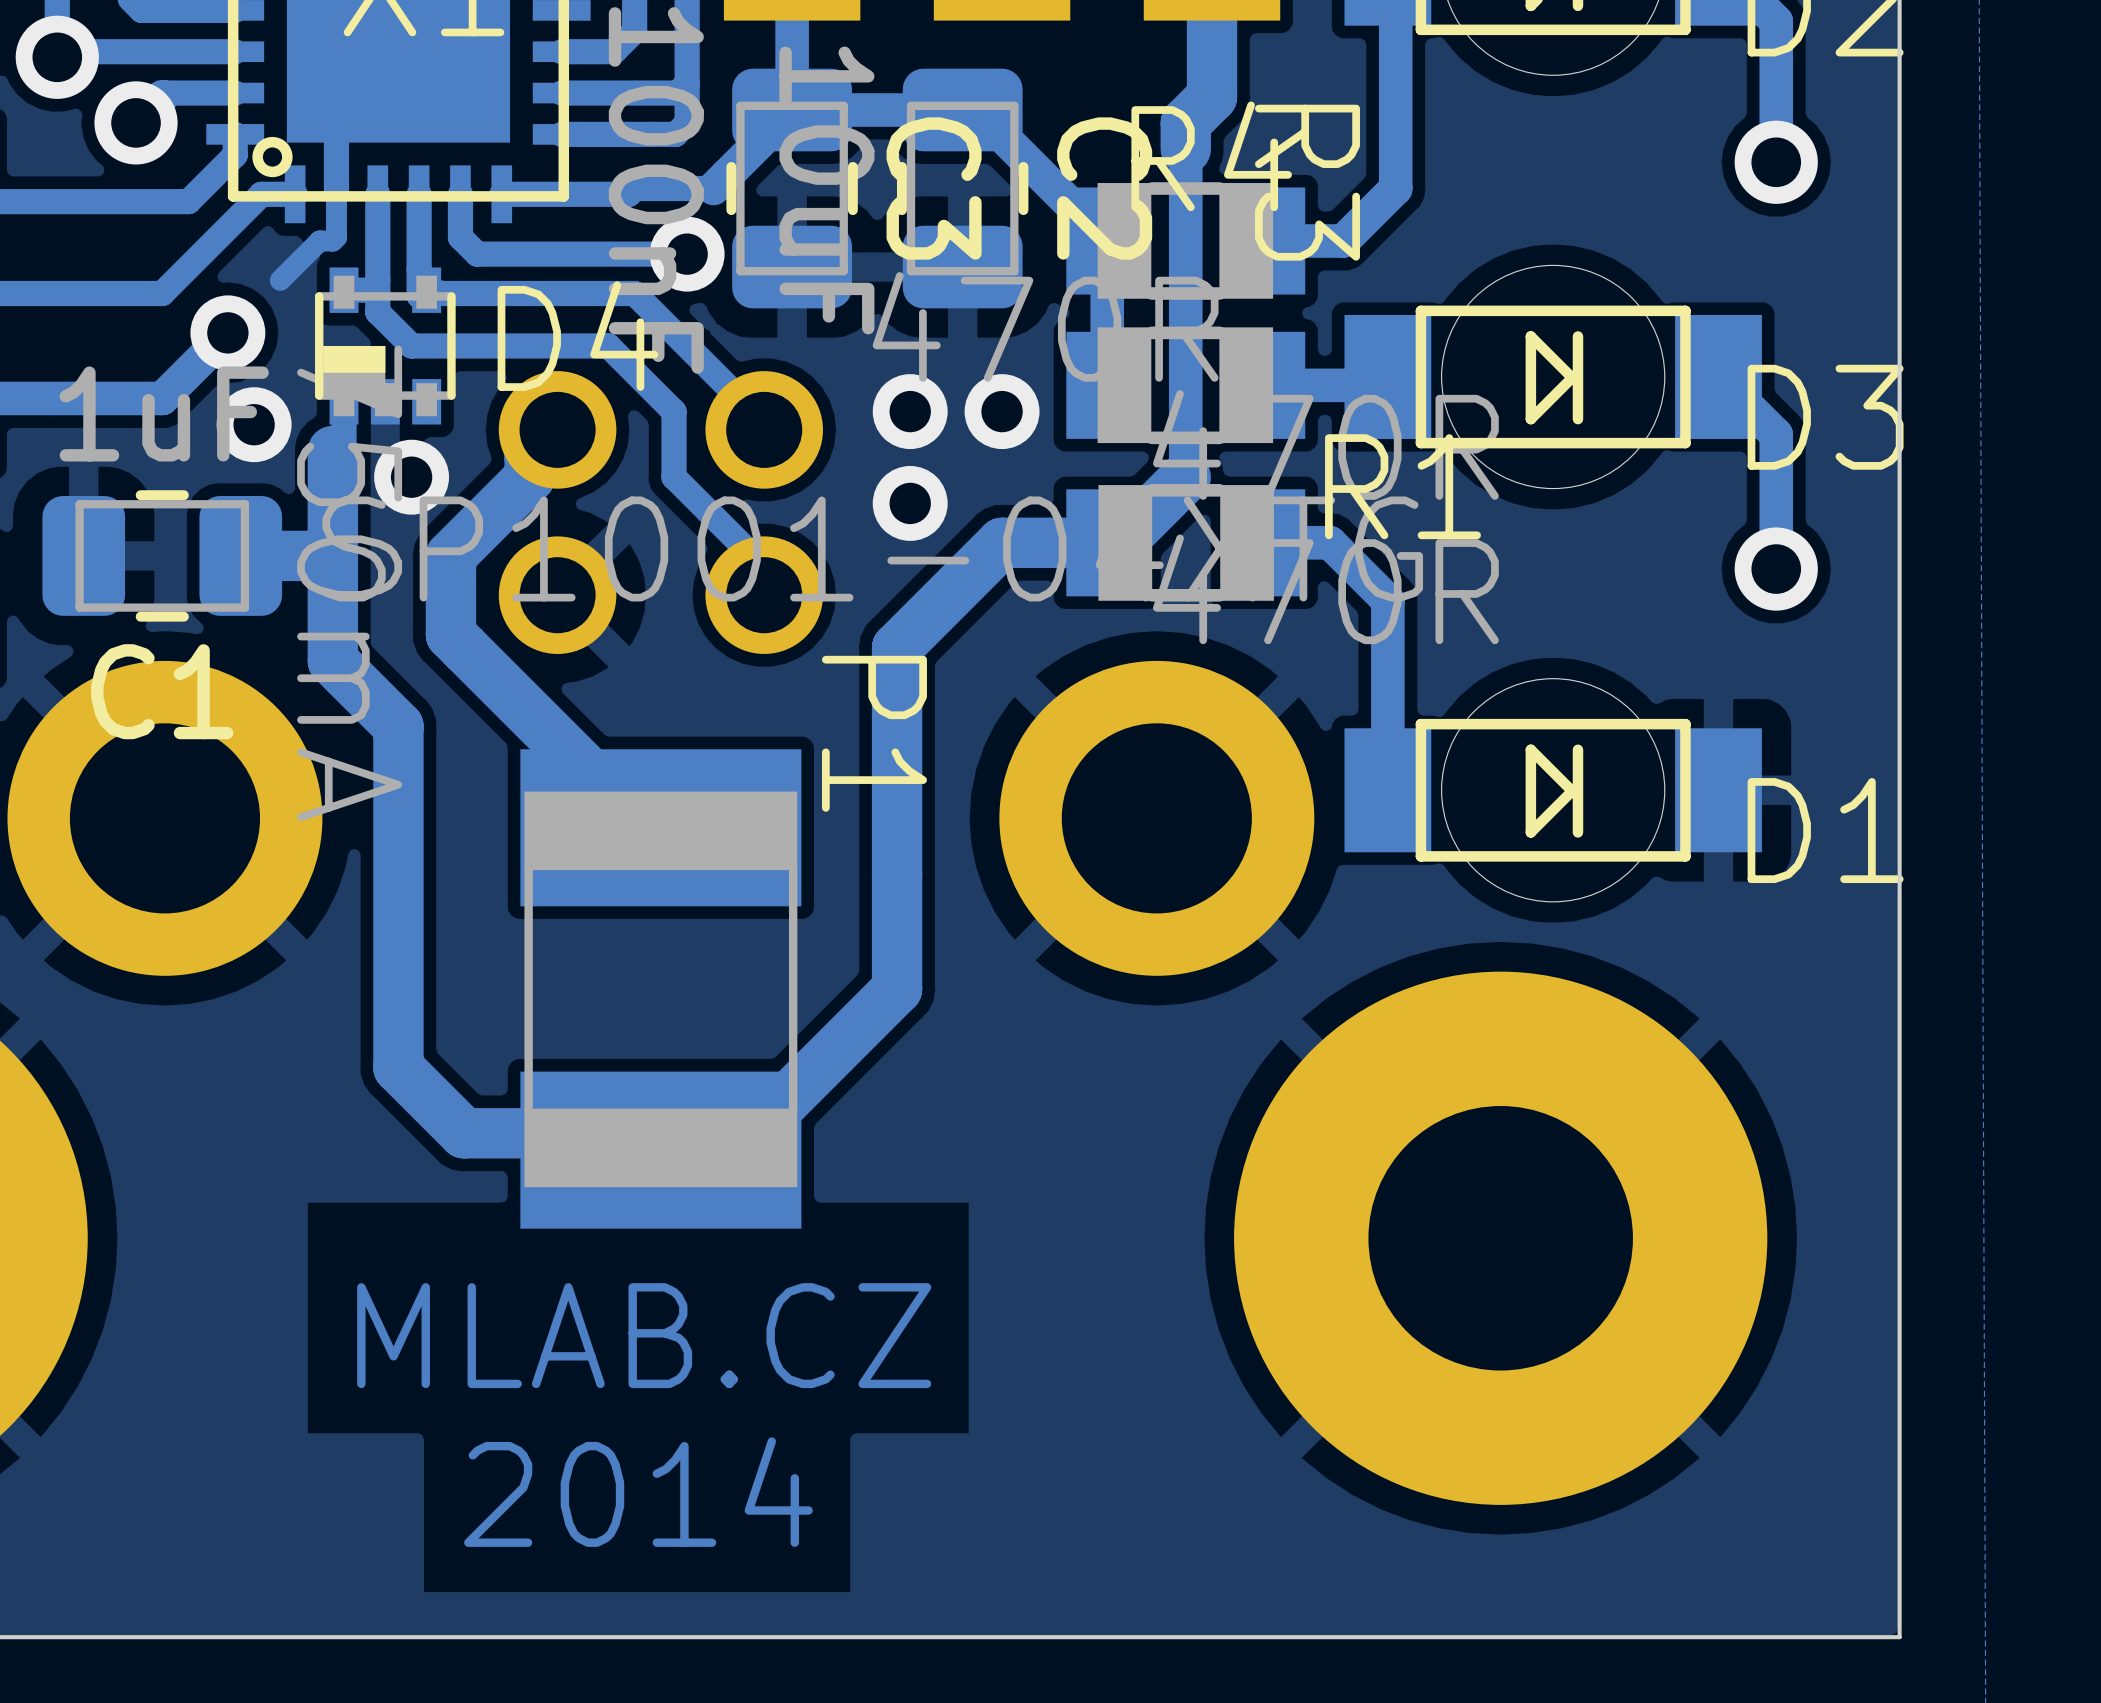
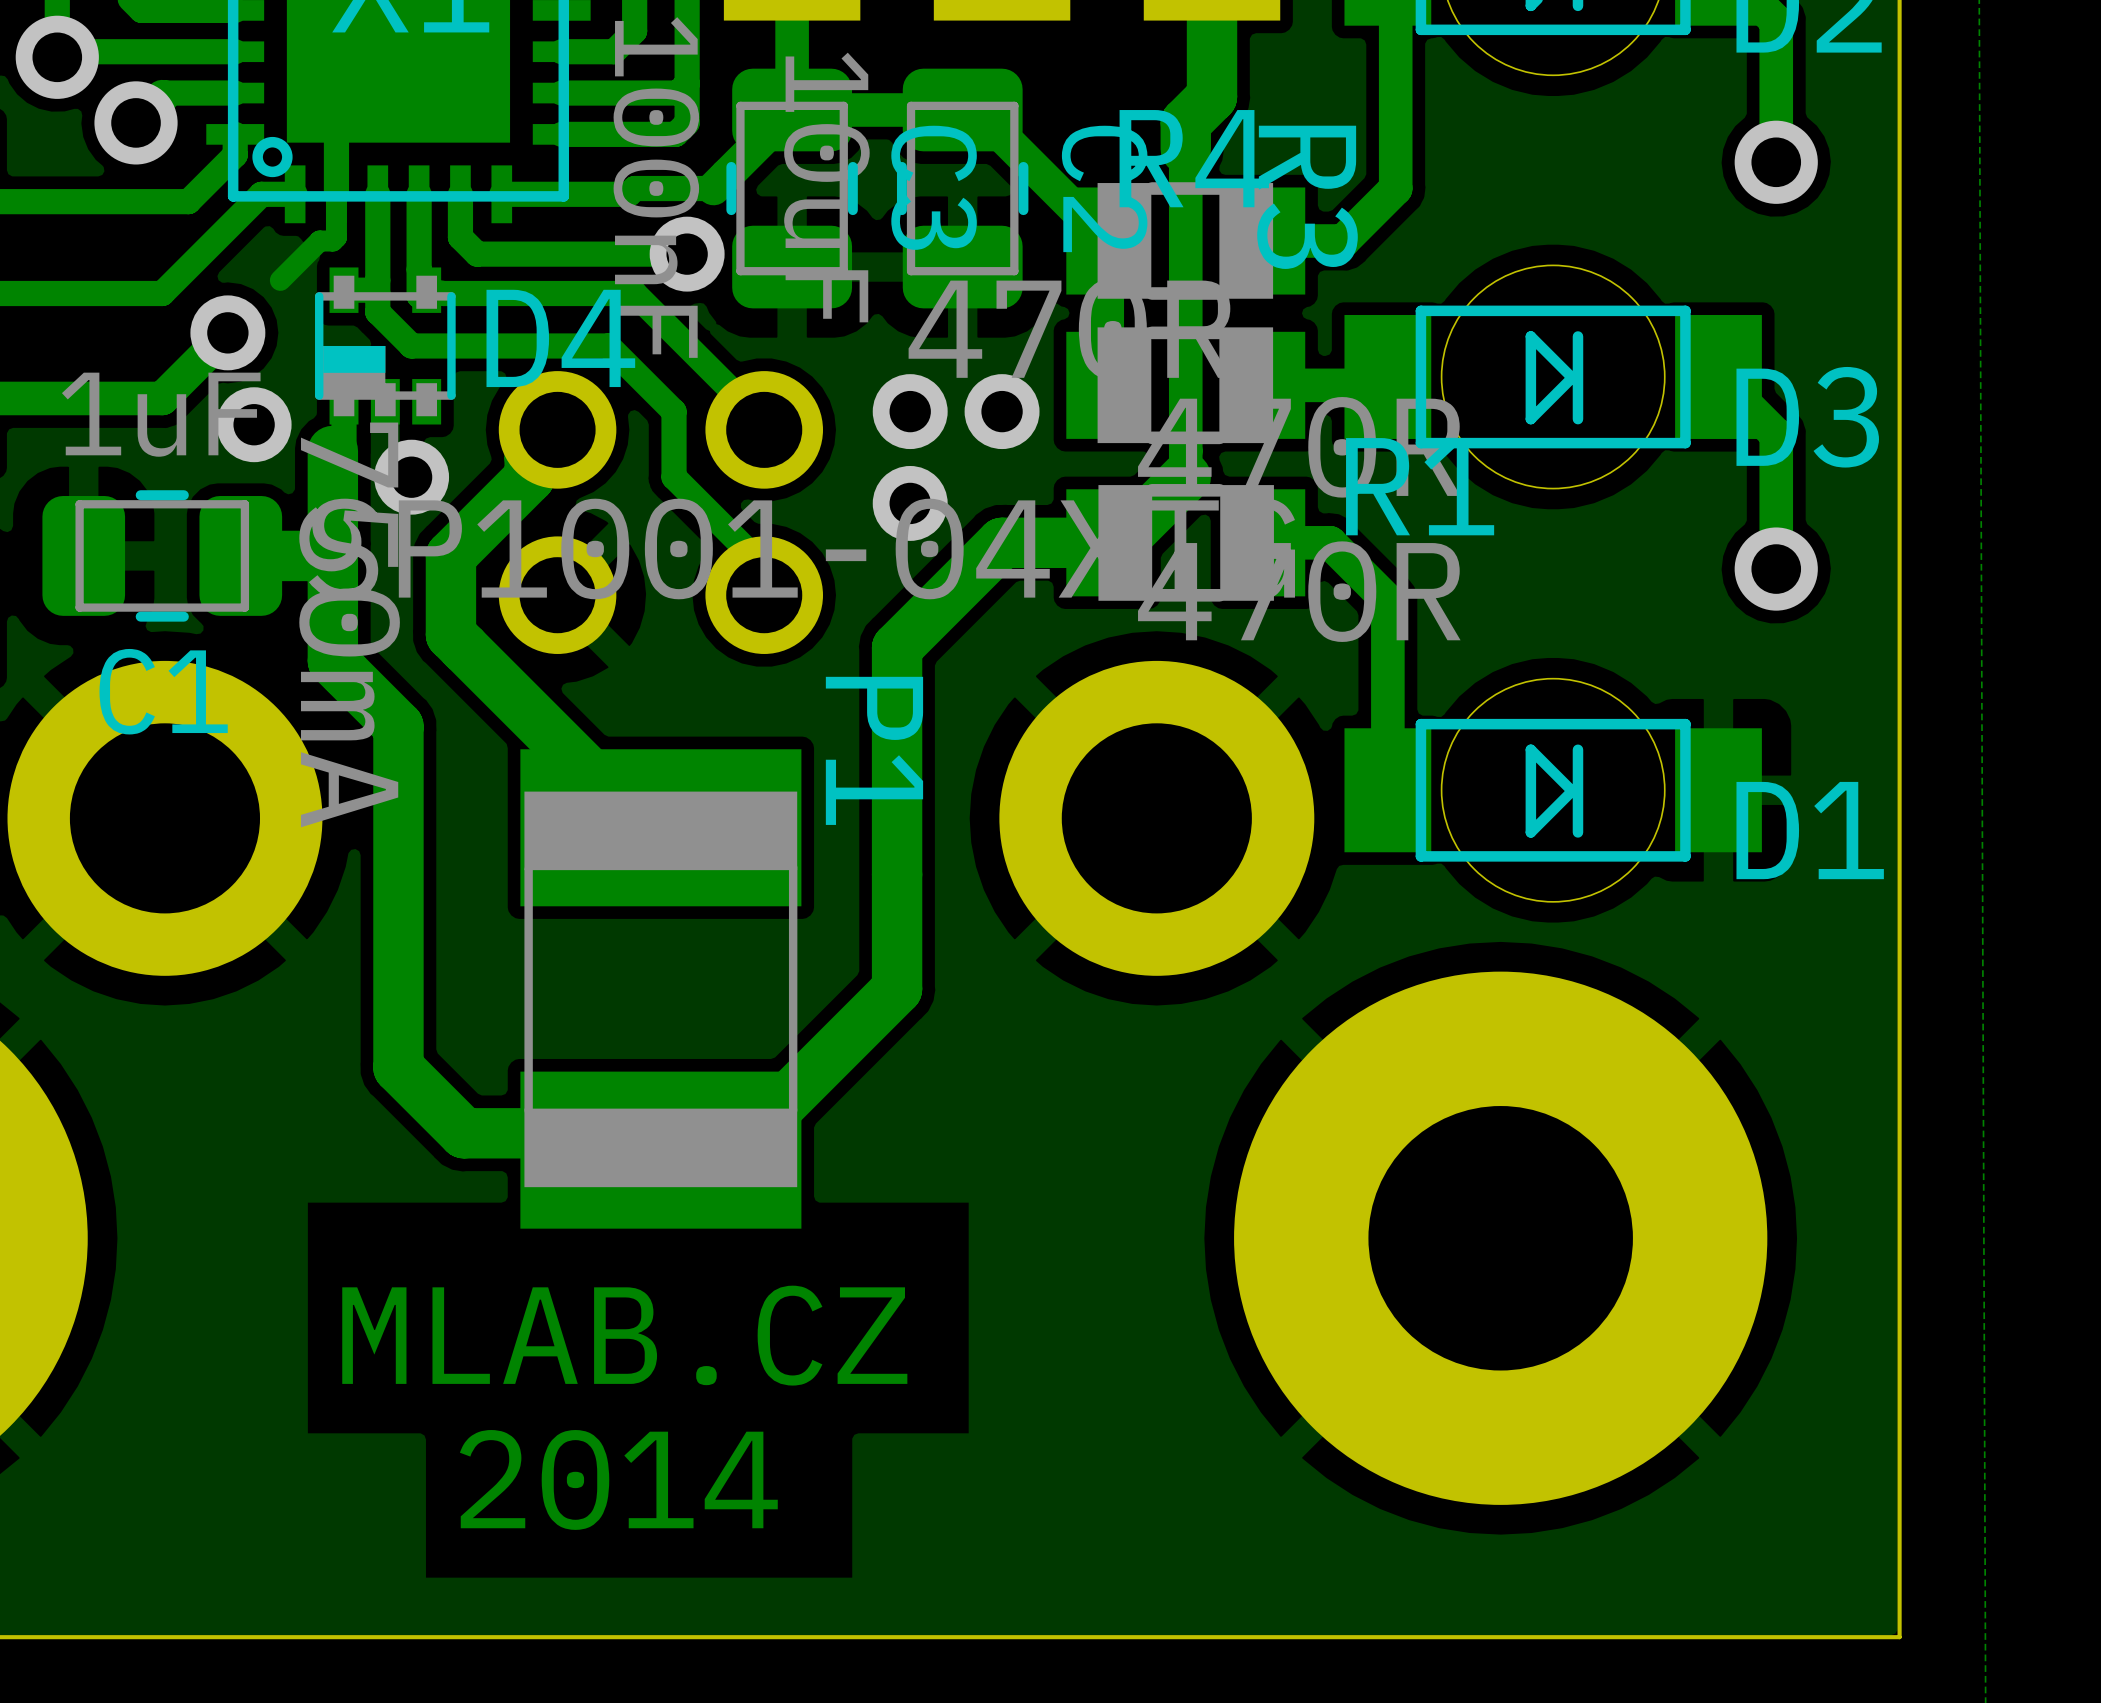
text position: 2014 (638, 1492) -> 2014 (618, 1479)

